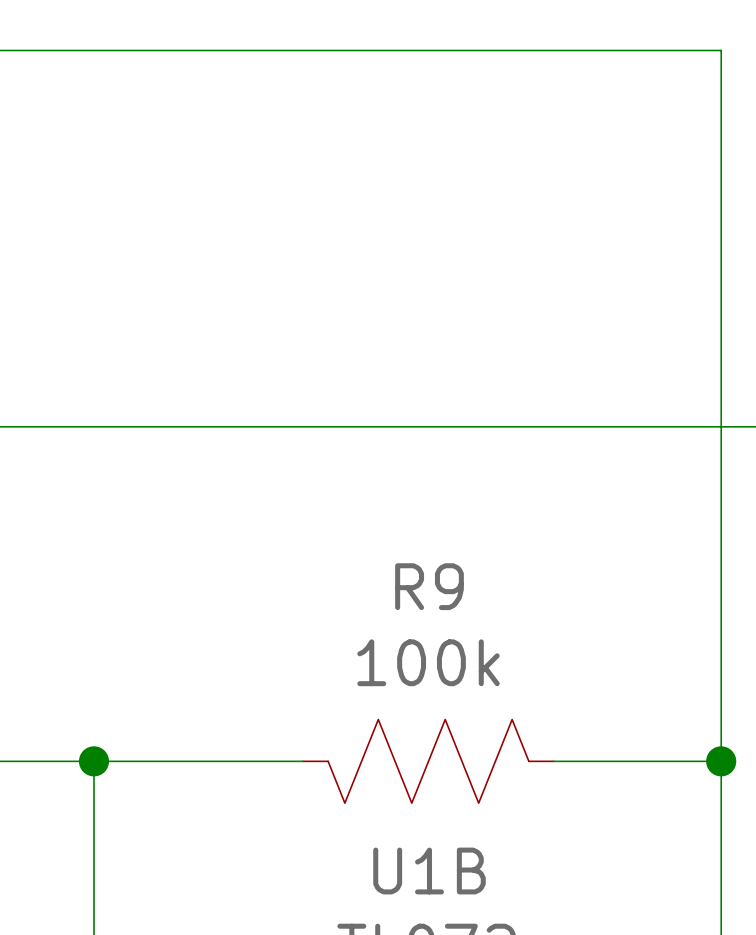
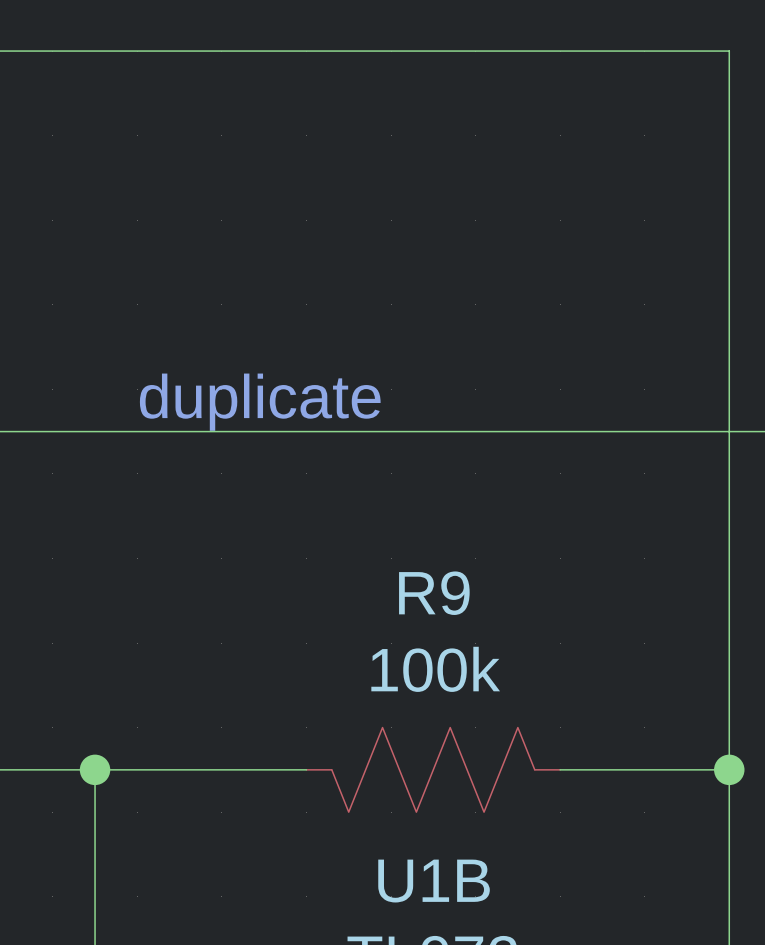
text: none -> duplicate (260, 402)

